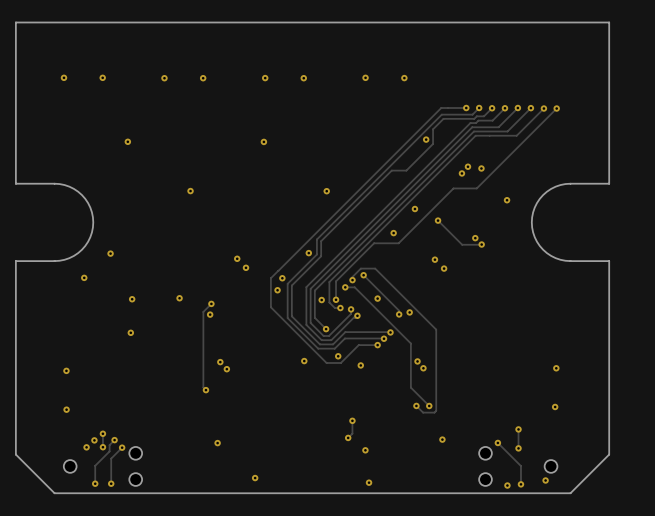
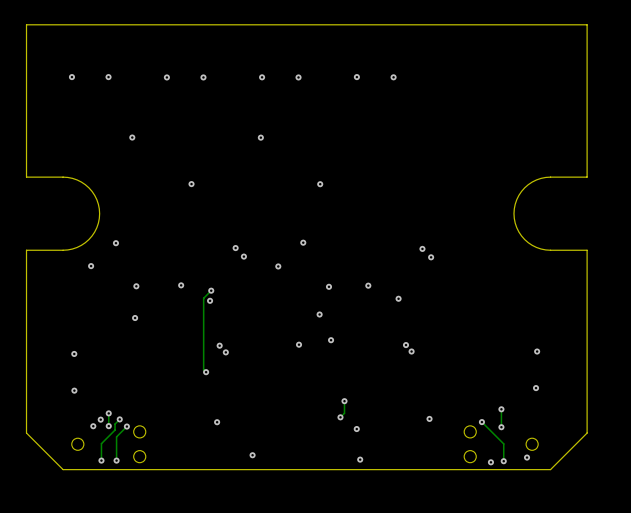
track: (466, 108) (441, 108) (278, 270) -> none
via: (466, 108) -> none
track: (479, 108) (472, 114) (441, 114) (316, 239) (316, 254) (287, 283) (287, 318) (318, 348) (334, 348) (344, 338) (384, 338) -> none
via: (479, 108) -> none
track: (492, 108) (484, 116) (476, 116) (474, 118) (443, 118) (433, 129) (433, 143) (406, 170) (391, 170) (321, 241) (321, 256) (291, 285) (291, 316) (319, 344) (333, 344) (345, 332) (390, 332) -> none
via: (492, 108) -> none
track: (504, 108) (492, 120) (478, 120) (476, 123) (470, 123) (306, 287) (306, 324) (321, 340) (331, 340) (355, 315) (357, 315) (355, 317) (353, 317) -> none
via: (504, 108) -> none
track: (517, 108) (498, 127) (472, 127) (310, 288) (310, 322) (323, 335) (328, 335) (351, 313) (351, 309) -> none
via: (517, 108) -> none
track: (530, 108) (507, 131) (473, 131) (314, 290) (314, 317) (326, 329) -> none
via: (530, 108) -> none
track: (543, 108) (516, 135) (475, 135) (329, 282) (329, 302) (334, 308) (340, 308) -> none
via: (543, 108) -> none
track: (556, 108) (476, 188) (453, 188) (398, 243) (374, 243) (336, 281) (336, 299) -> none
via: (556, 108) -> none
via: (426, 139) -> none
via: (467, 166) -> none
via: (481, 168) -> none
via: (461, 173) -> none
via: (507, 200) -> none
via: (414, 208) -> none
track: (438, 220) (462, 244) (481, 244) -> none
via: (438, 220) -> none
via: (393, 233) -> none
via: (475, 238) -> none
via: (481, 244) -> none
track: (278, 270) (270, 278) (270, 307) (326, 362) (340, 362) (358, 345) (377, 345) -> none
track: (363, 275) (399, 310) (399, 314) -> none
via: (363, 275) -> none
track: (352, 280) (352, 276) (360, 268) (375, 268) (436, 329) (436, 410) (434, 412) (423, 412) (416, 405) -> none
via: (352, 280) -> none
track: (345, 287) (354, 287) (410, 343) (410, 387) (429, 405) -> none
via: (345, 287) -> none
via: (277, 290) -> none
via: (321, 300) -> none
via: (340, 308) -> none
via: (351, 309) -> none
via: (399, 314) -> none
via: (357, 315) -> none
via: (390, 332) -> none
via: (384, 338) -> none
via: (377, 345) -> none
via: (360, 365) -> none
via: (416, 405) -> none
via: (429, 405) -> none

